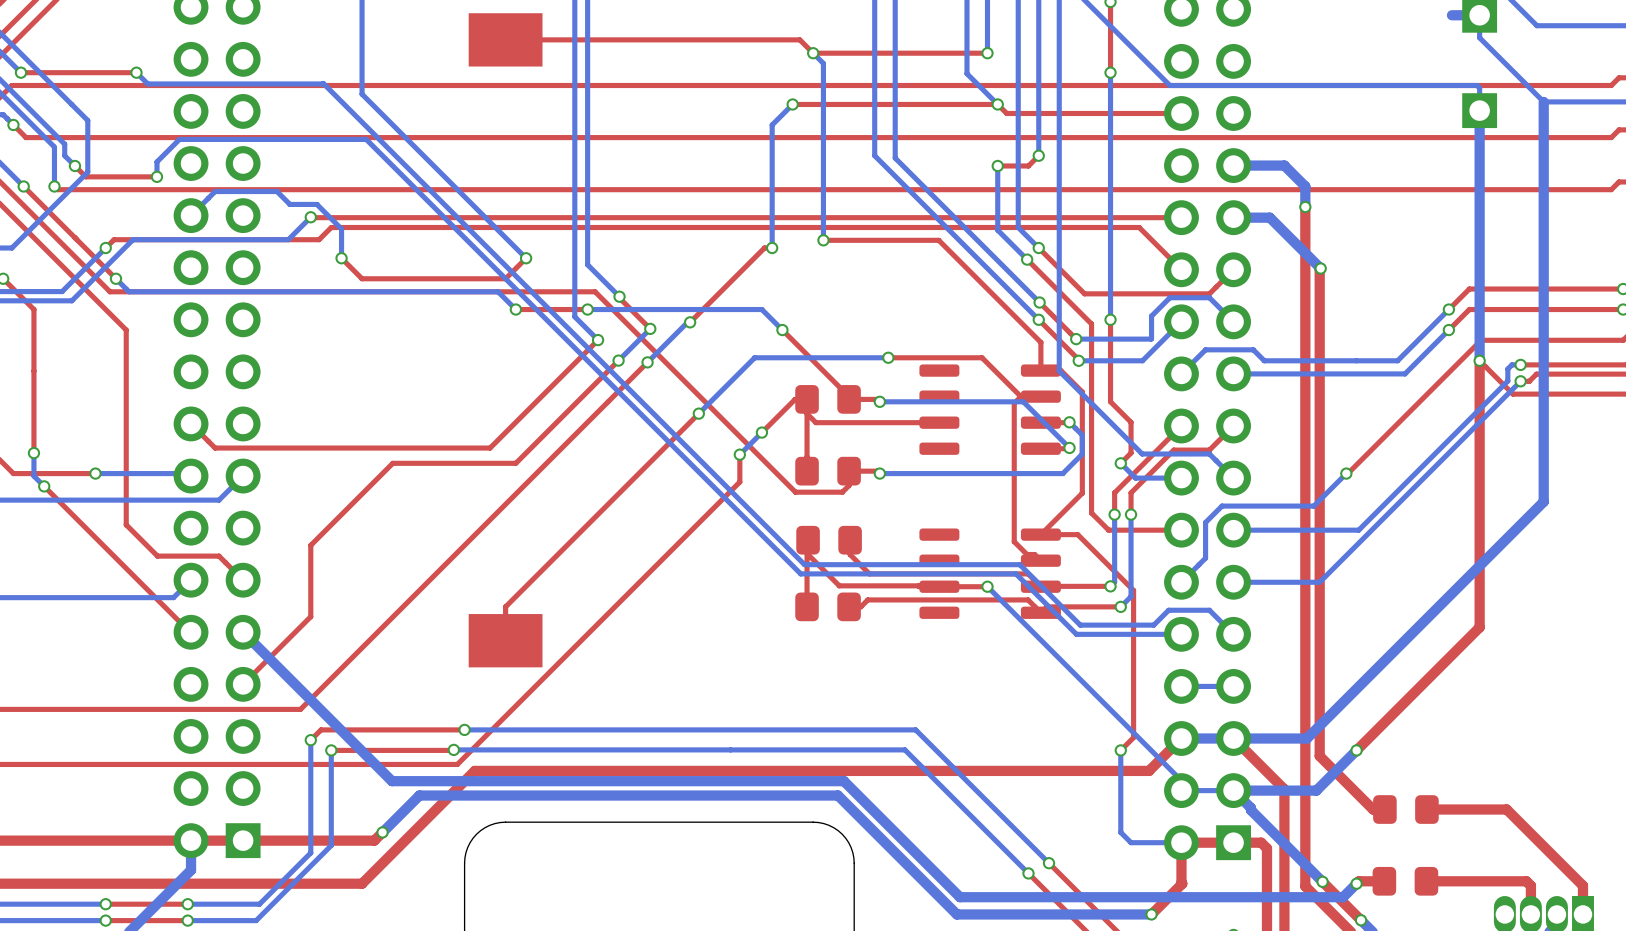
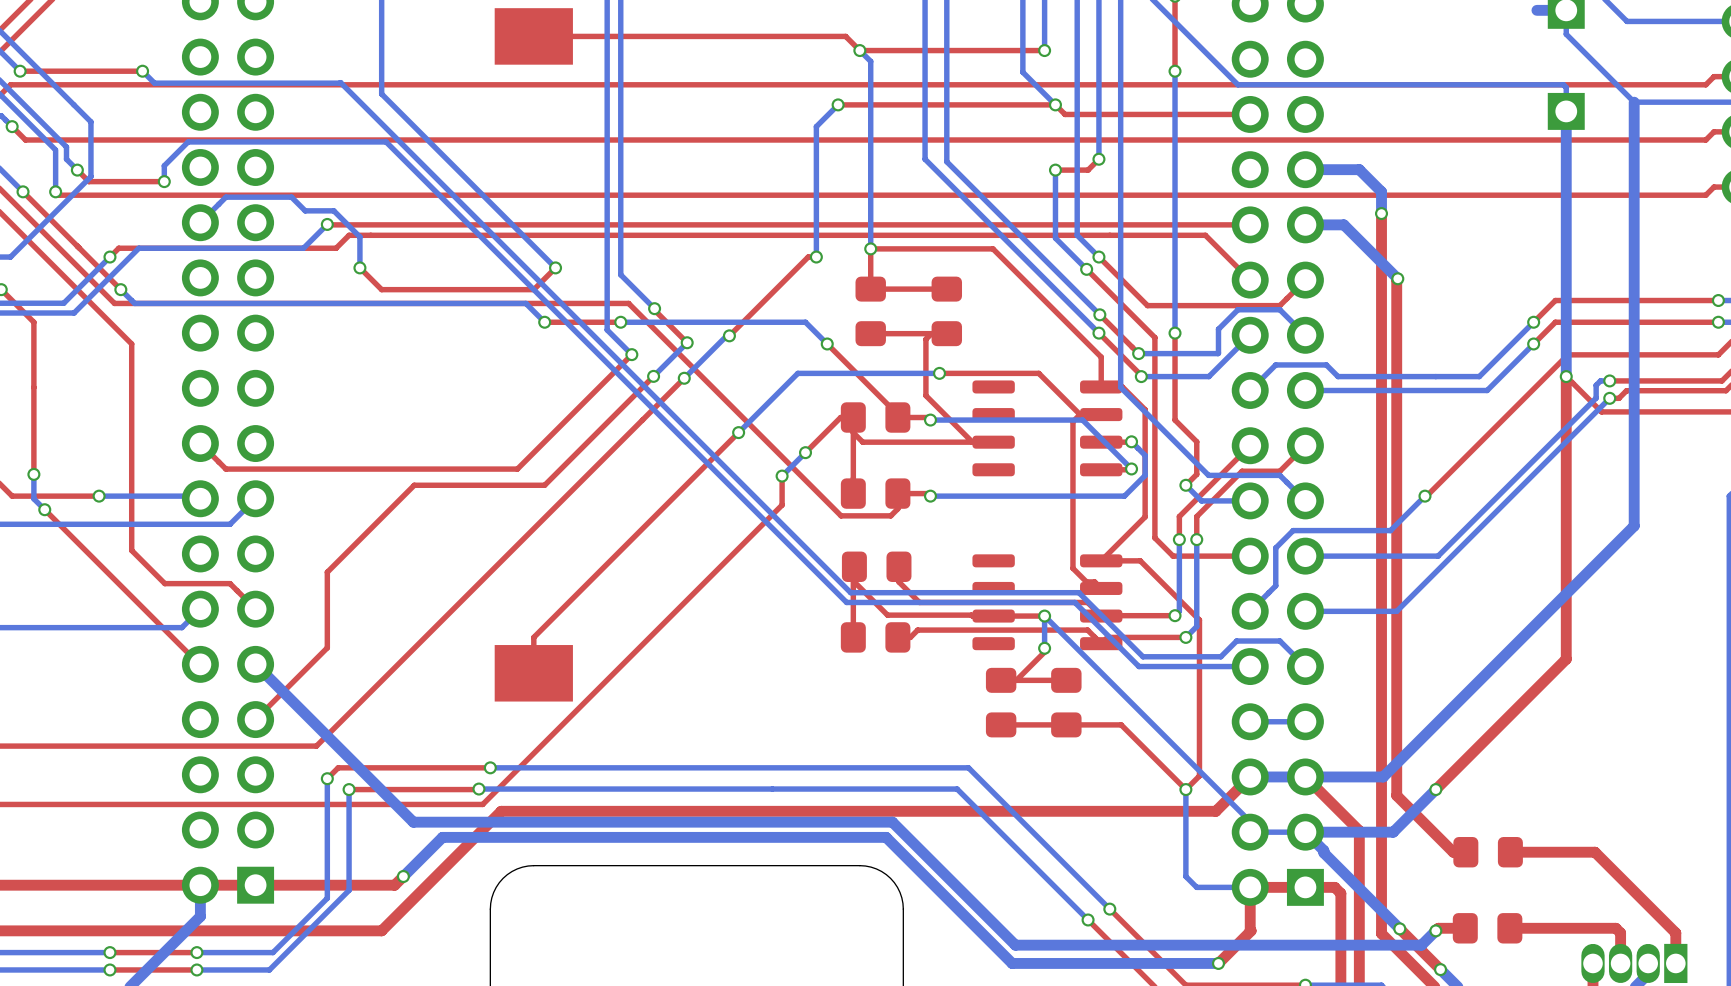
top track: none -> (870, 248) (870, 289) (946, 289)
part: none -> (870, 311)
part: none -> (946, 311)
top track: none -> (931, 333) (925, 339) (925, 395) (972, 442)
top track: none -> (946, 333) (870, 333)
bottom track: none -> (1044, 616) (1044, 648)
top track: none -> (1044, 648) (1044, 652) (1016, 680)
via: none -> (1044, 648)
top track: none -> (1066, 680) (1001, 680)
part: none -> (1001, 702)
part: none -> (1066, 702)
top track: none -> (1001, 724) (1121, 724) (1185, 789)

